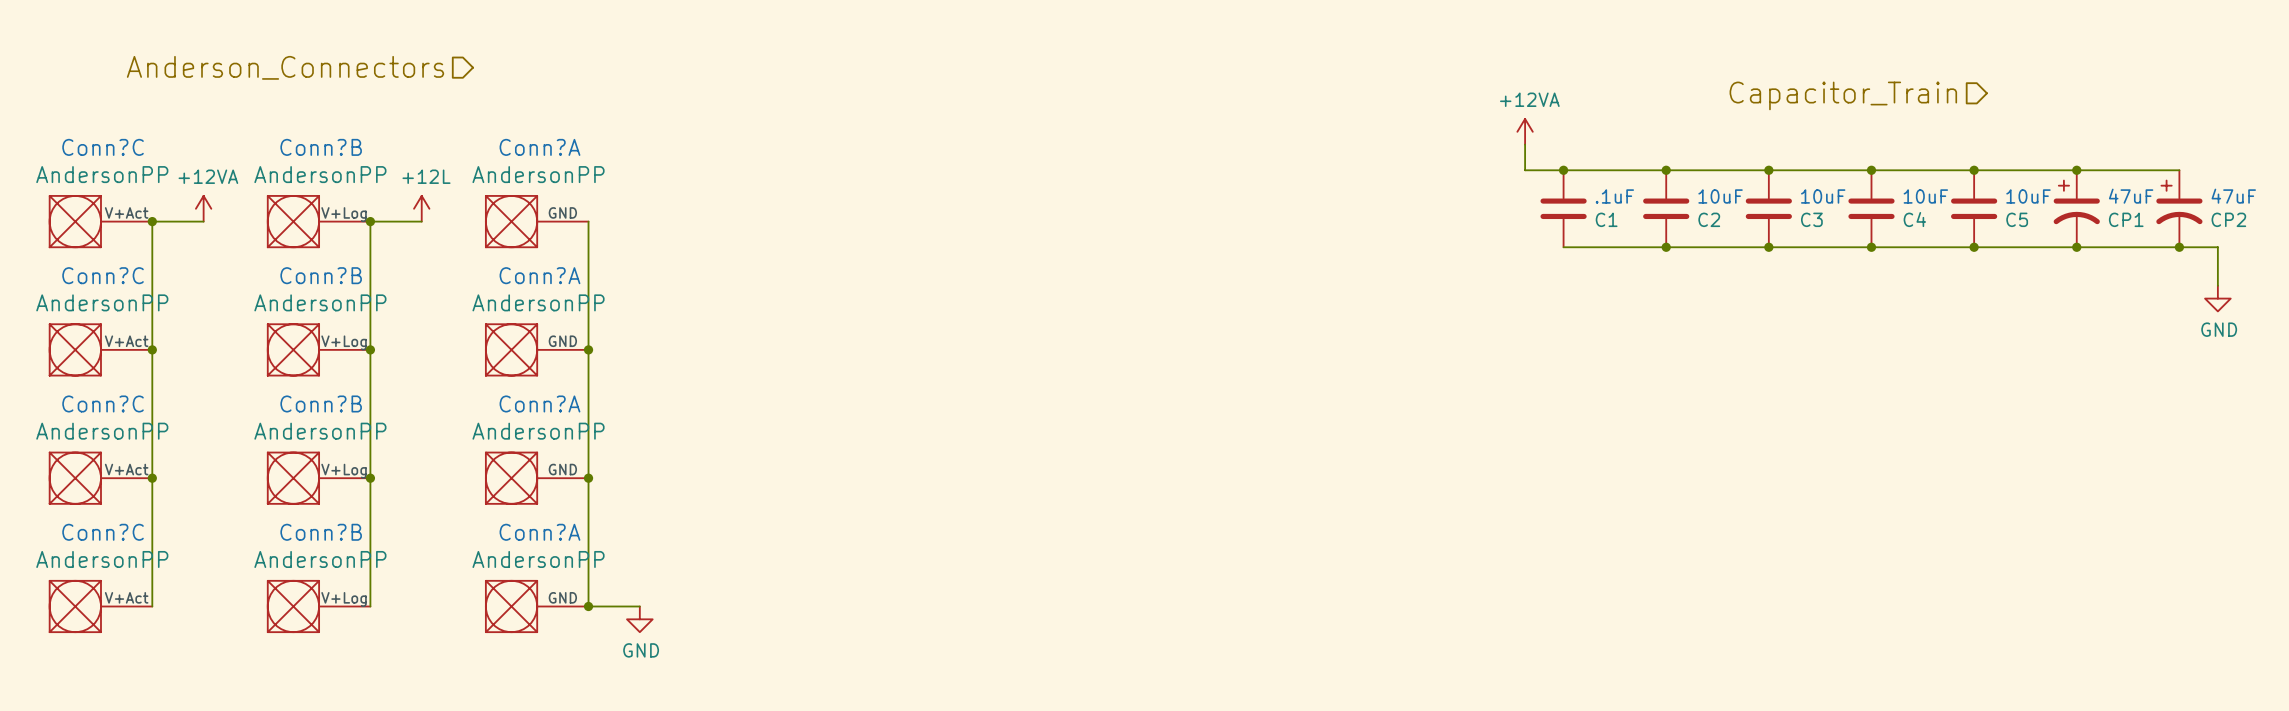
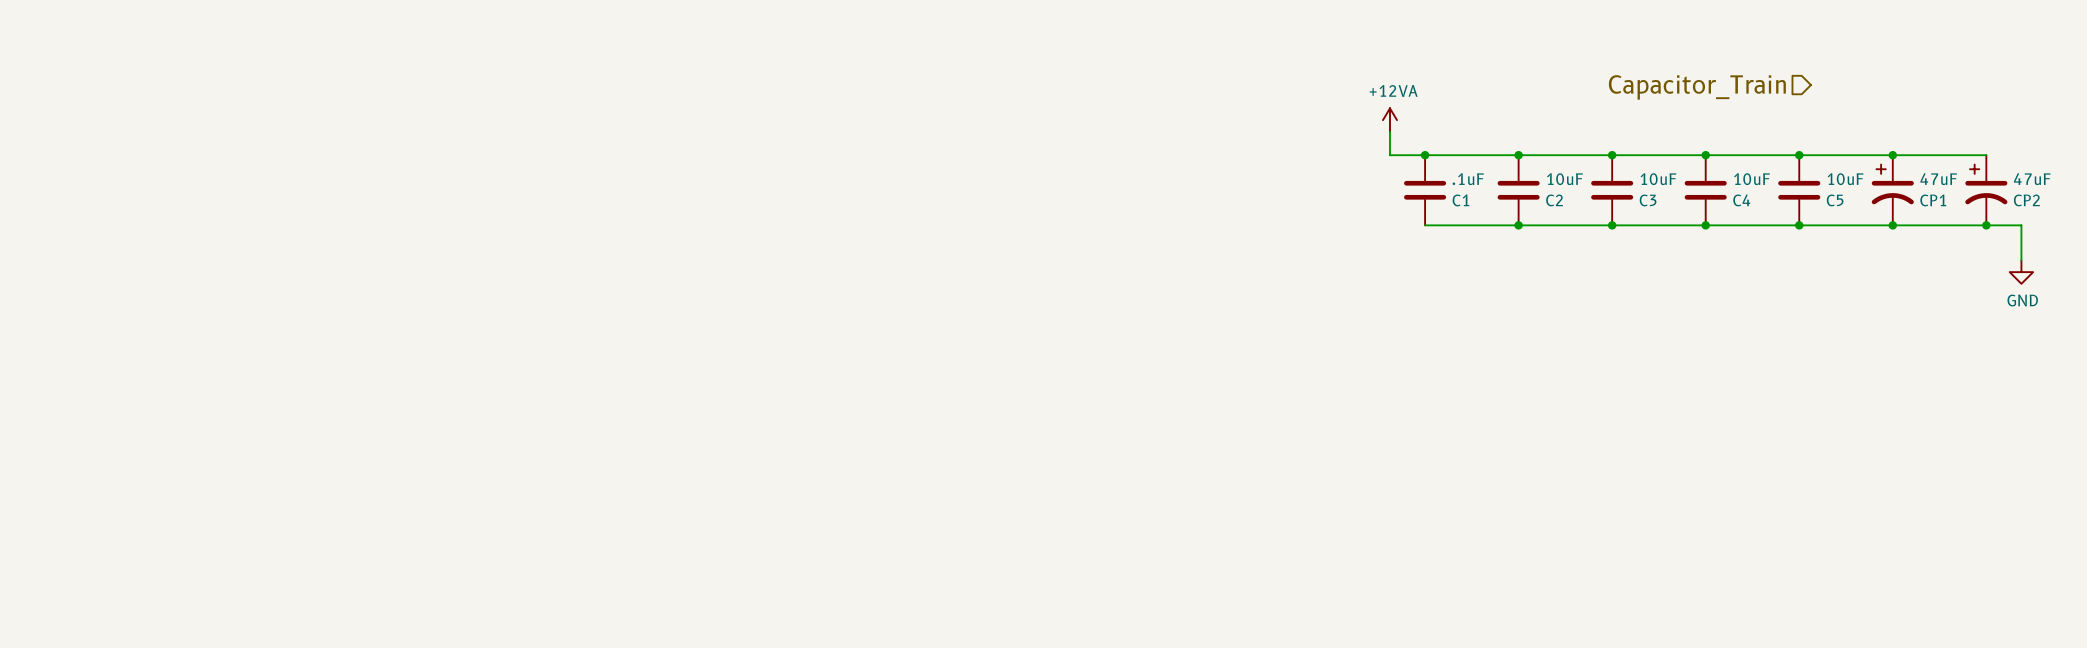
hierarchical label: Anderson_Connectors (285, 67) -> none
power symbol: +12VA (203, 208) -> none
power symbol: +12L (421, 208) -> none
Conn?C: AndersonPP (100, 221) -> none
junction: (152, 221) -> none
wire: (203, 221) (152, 221) (152, 606) -> none
Conn?B: AndersonPP (319, 221) -> none
junction: (370, 221) -> none
wire: (421, 221) (370, 221) (370, 606) -> none
Conn?A: AndersonPP (537, 221) -> none
wire: (588, 221) (588, 606) (639, 606) -> none
Conn?C: AndersonPP (100, 349) -> none
junction: (152, 349) -> none
Conn?B: AndersonPP (319, 349) -> none
junction: (370, 349) -> none
Conn?A: AndersonPP (537, 349) -> none
junction: (588, 349) -> none
Conn?C: AndersonPP (100, 478) -> none
junction: (152, 478) -> none
Conn?B: AndersonPP (319, 478) -> none
junction: (370, 478) -> none
Conn?A: AndersonPP (537, 478) -> none
junction: (588, 478) -> none
Conn?C: AndersonPP (100, 606) -> none
Conn?B: AndersonPP (319, 606) -> none
Conn?A: AndersonPP (537, 606) -> none
junction: (588, 606) -> none
power symbol: GND (639, 619) -> none

